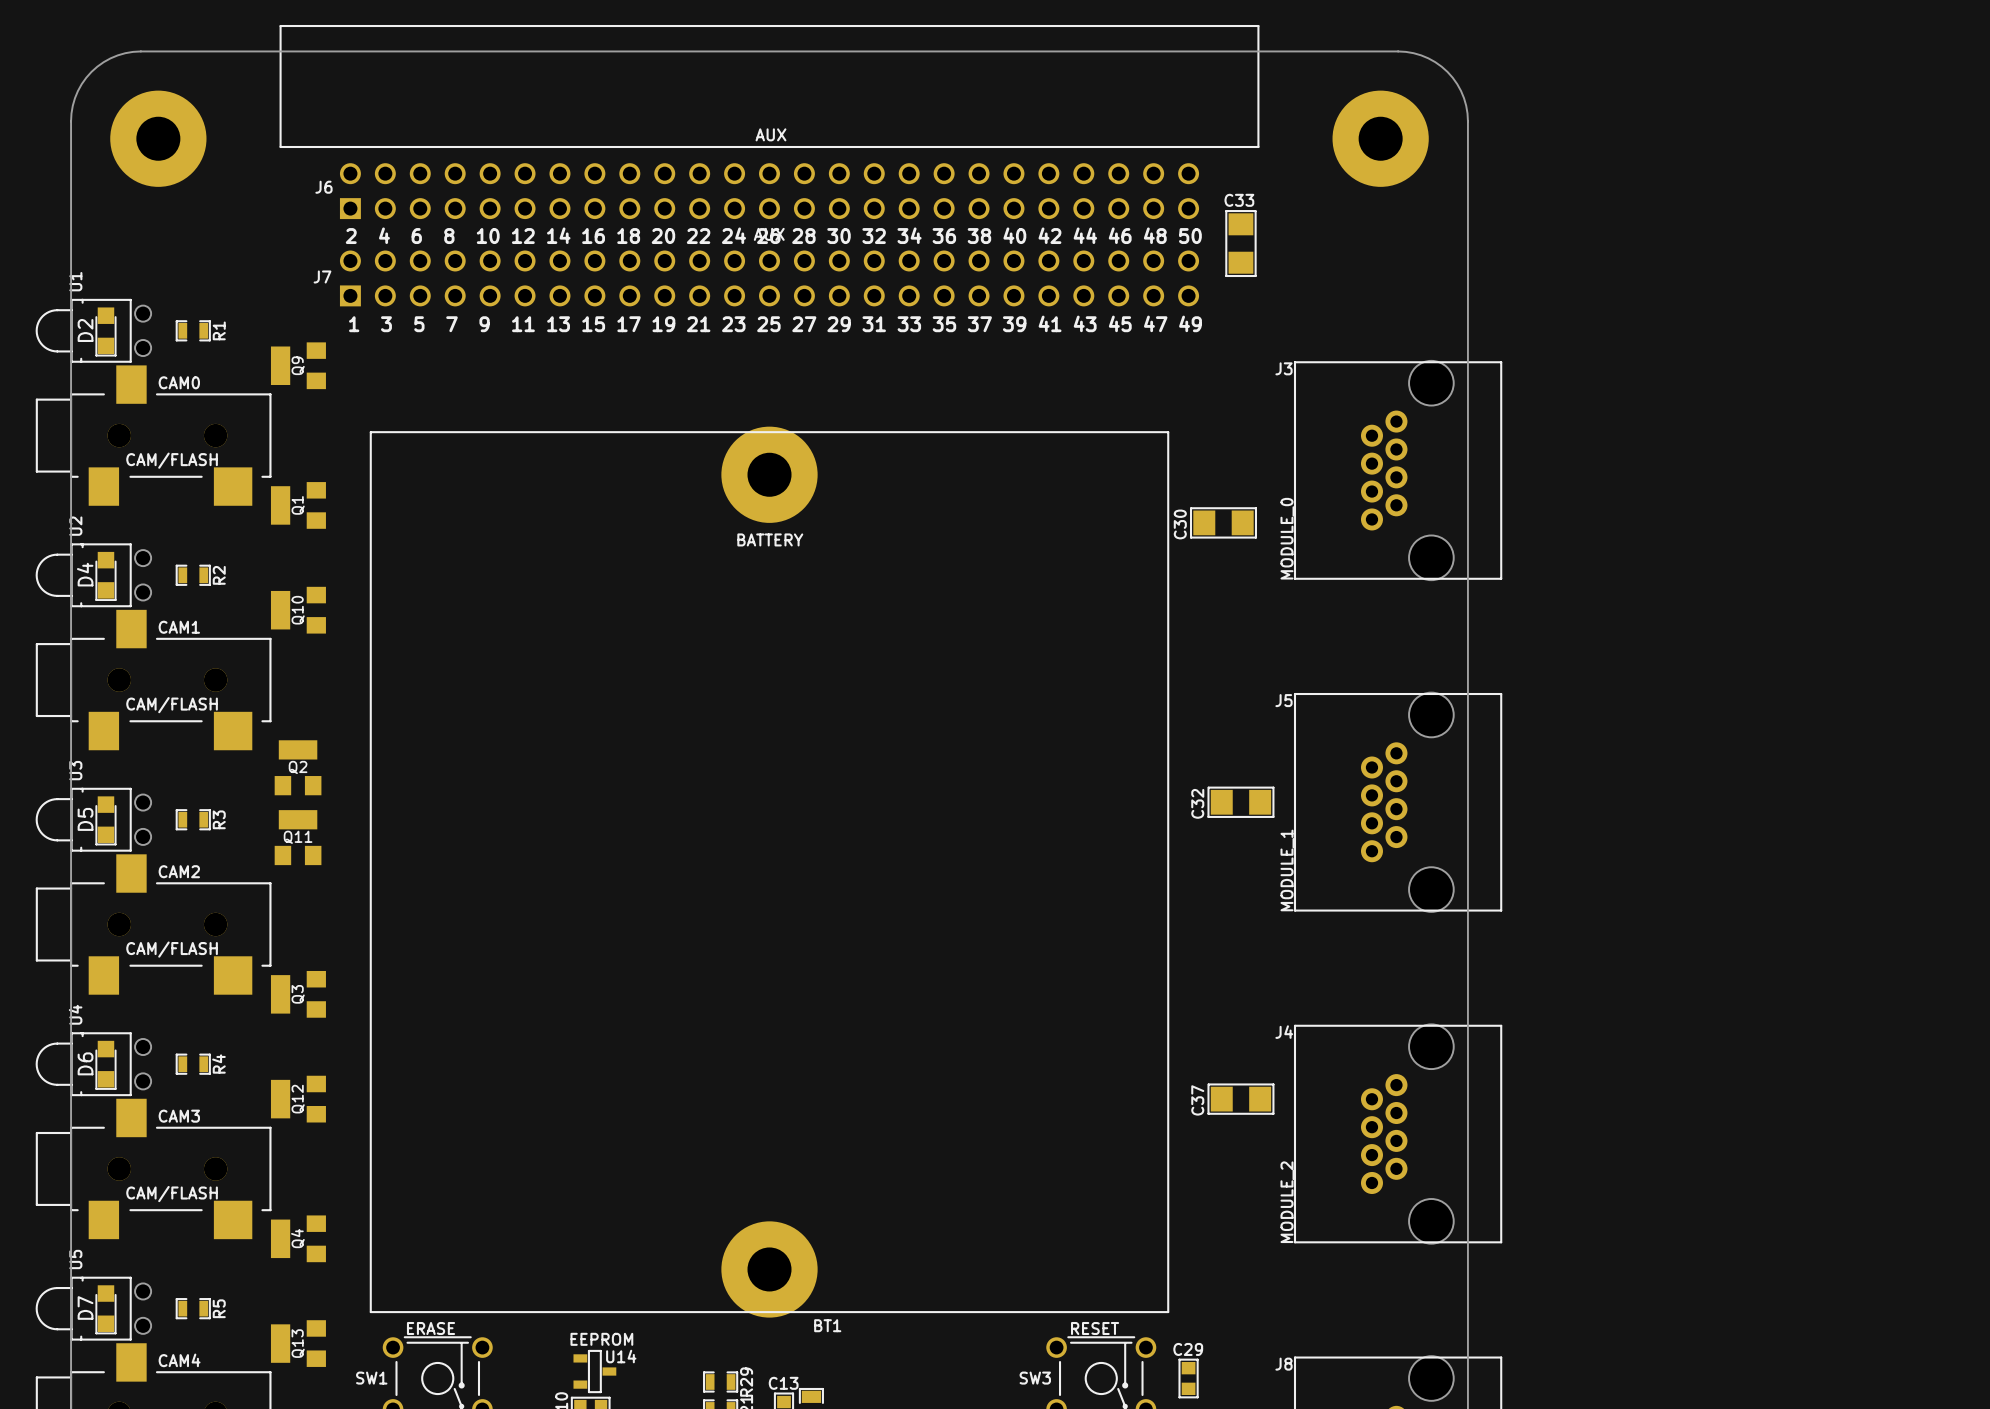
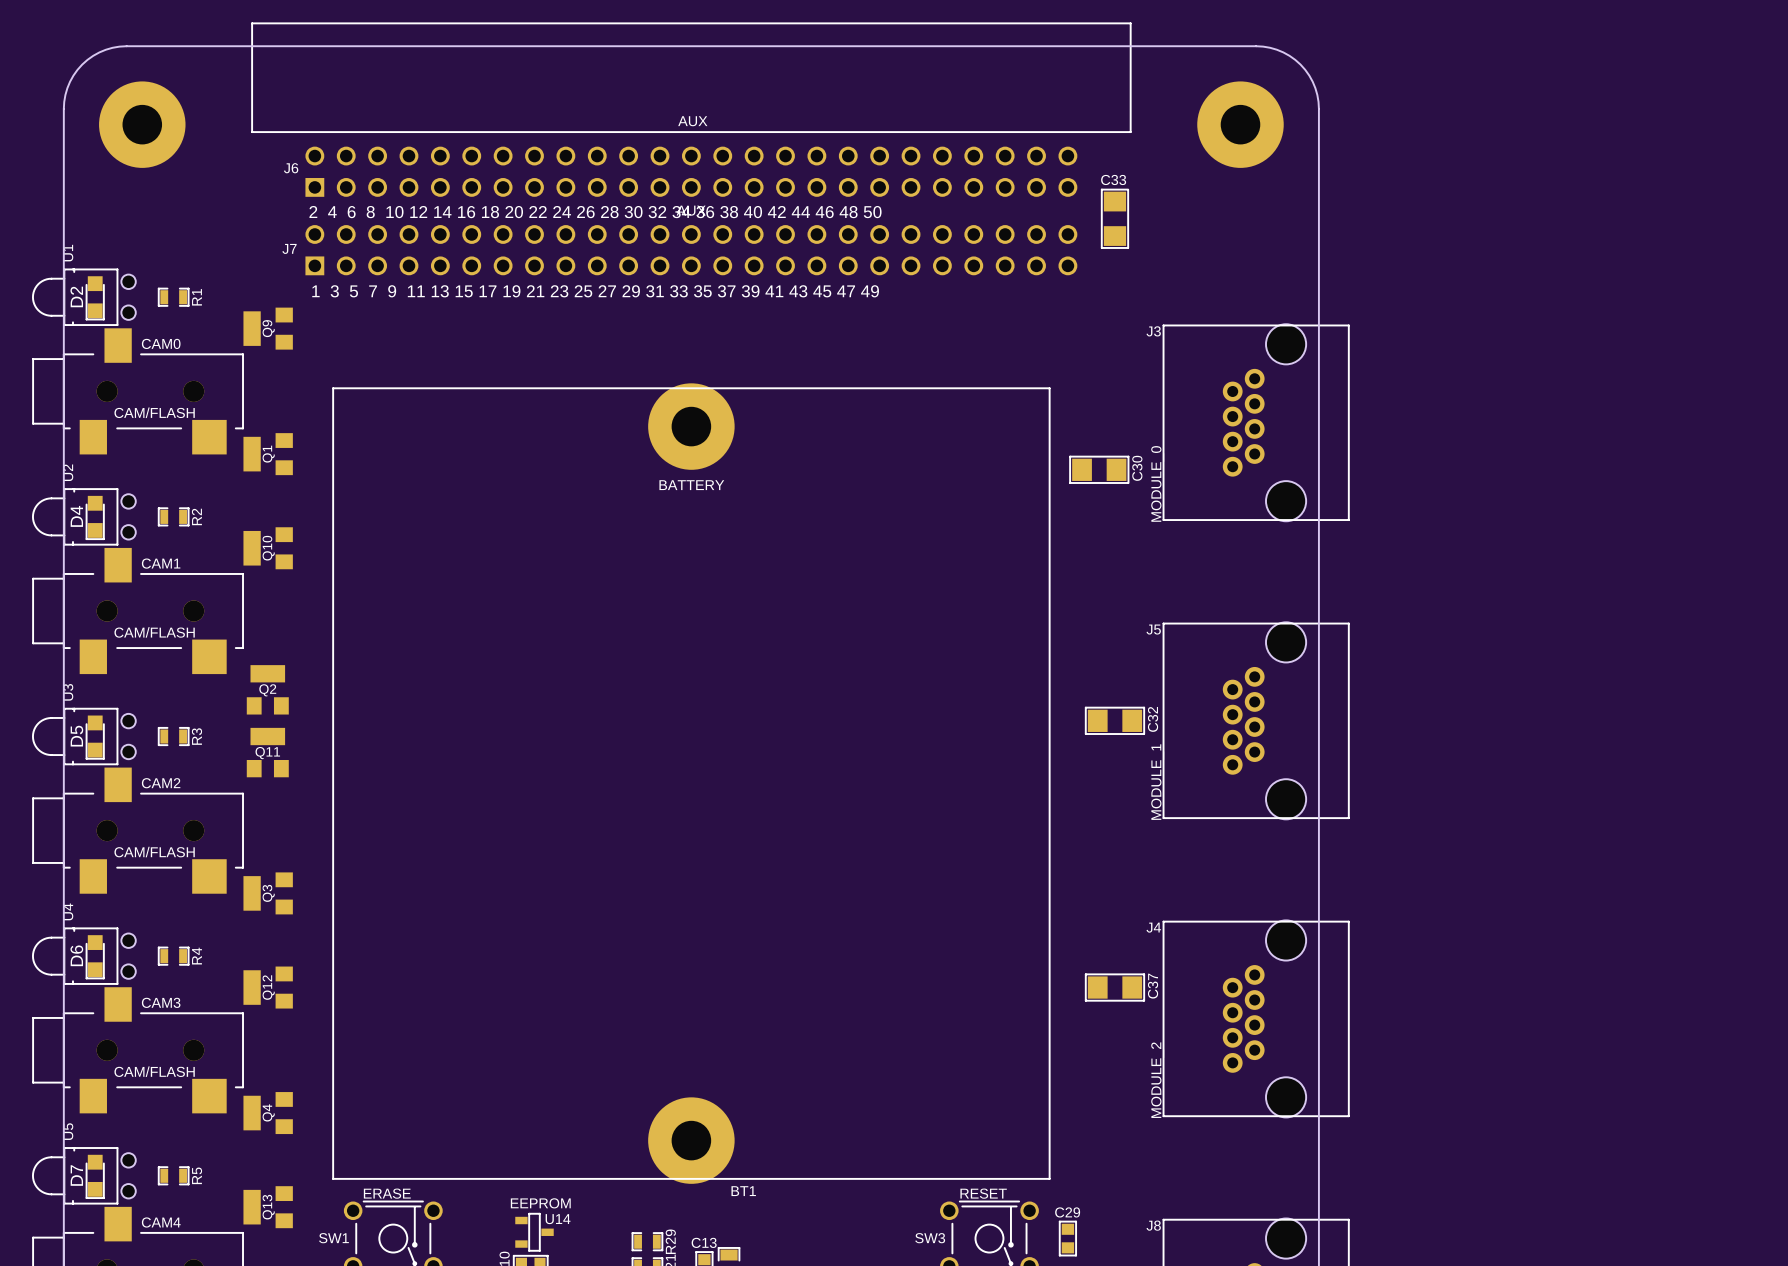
C30 rotation: 0° (1223, 522) -> 180° (1099, 469)
C32 rotation: 0° (1240, 802) -> 180° (1114, 720)
C37 rotation: 0° (1240, 1099) -> 180° (1114, 987)

